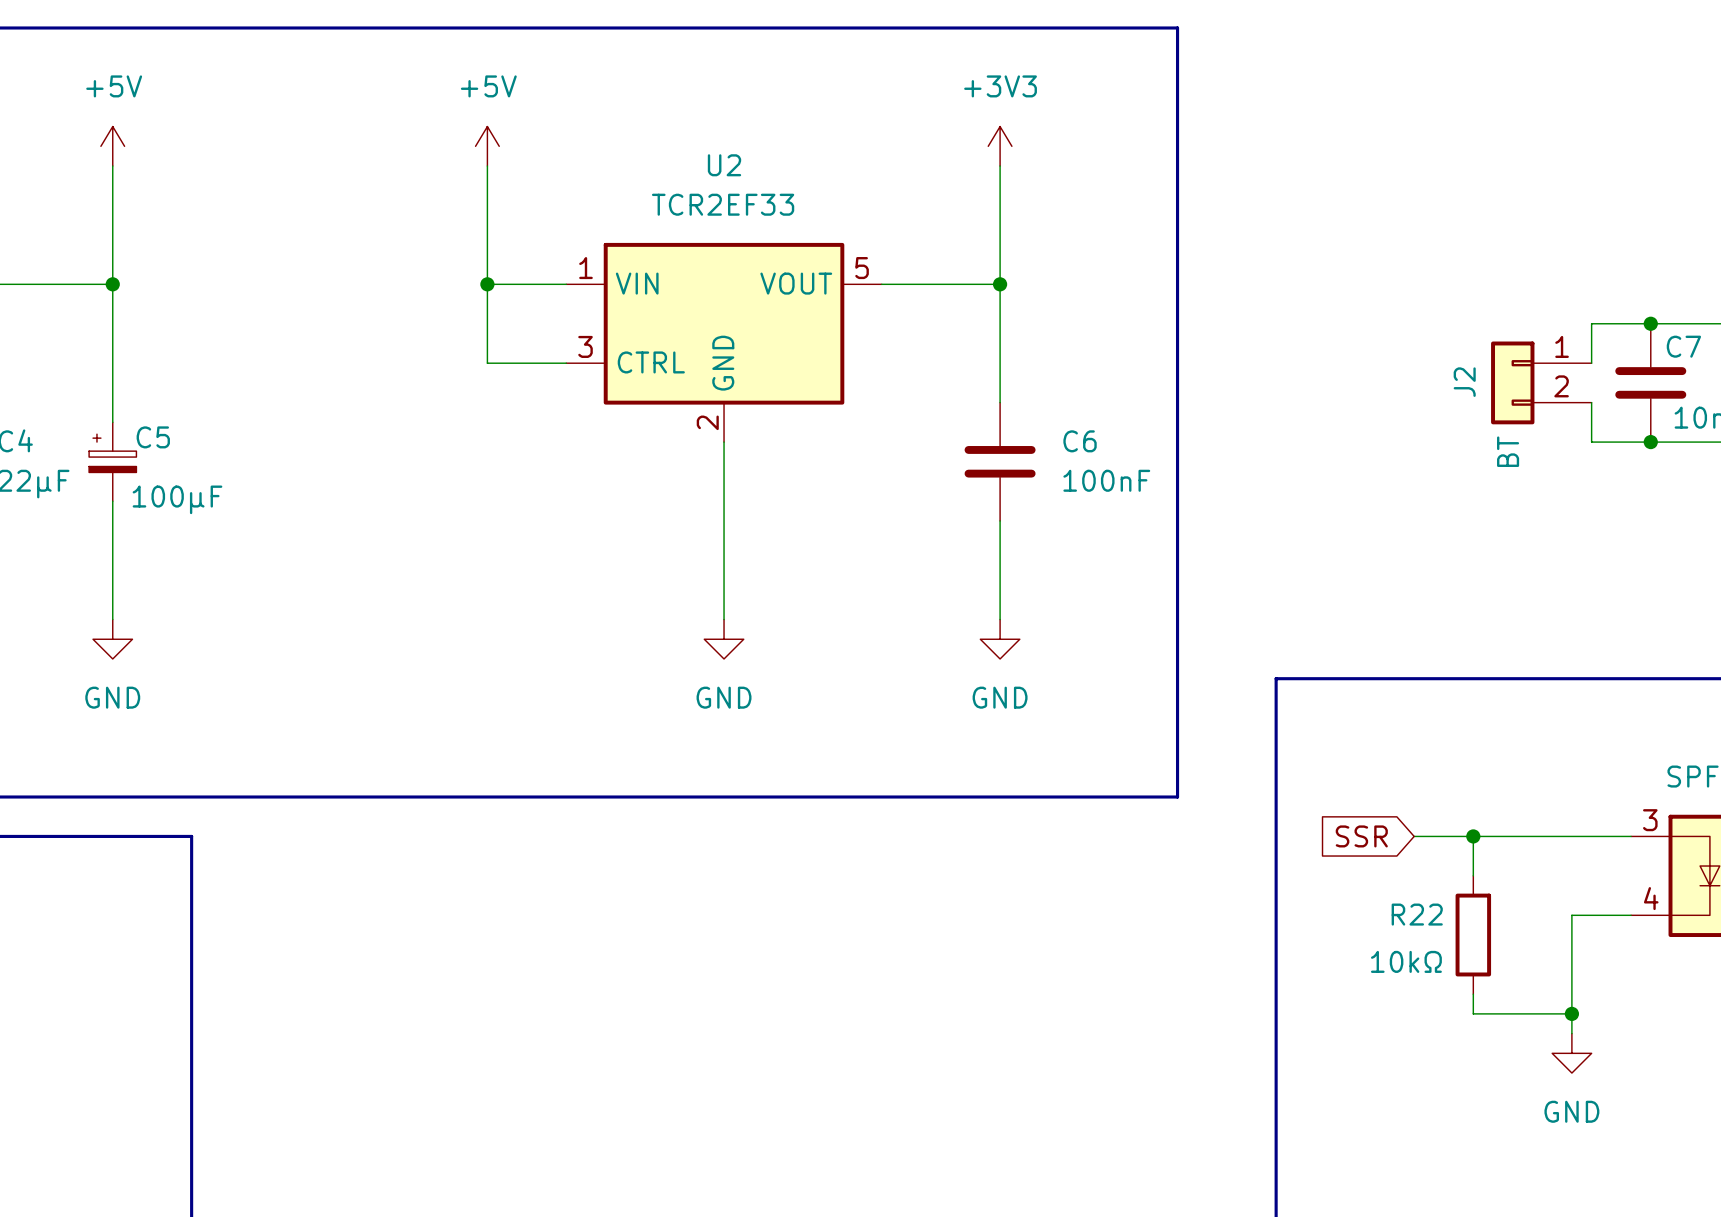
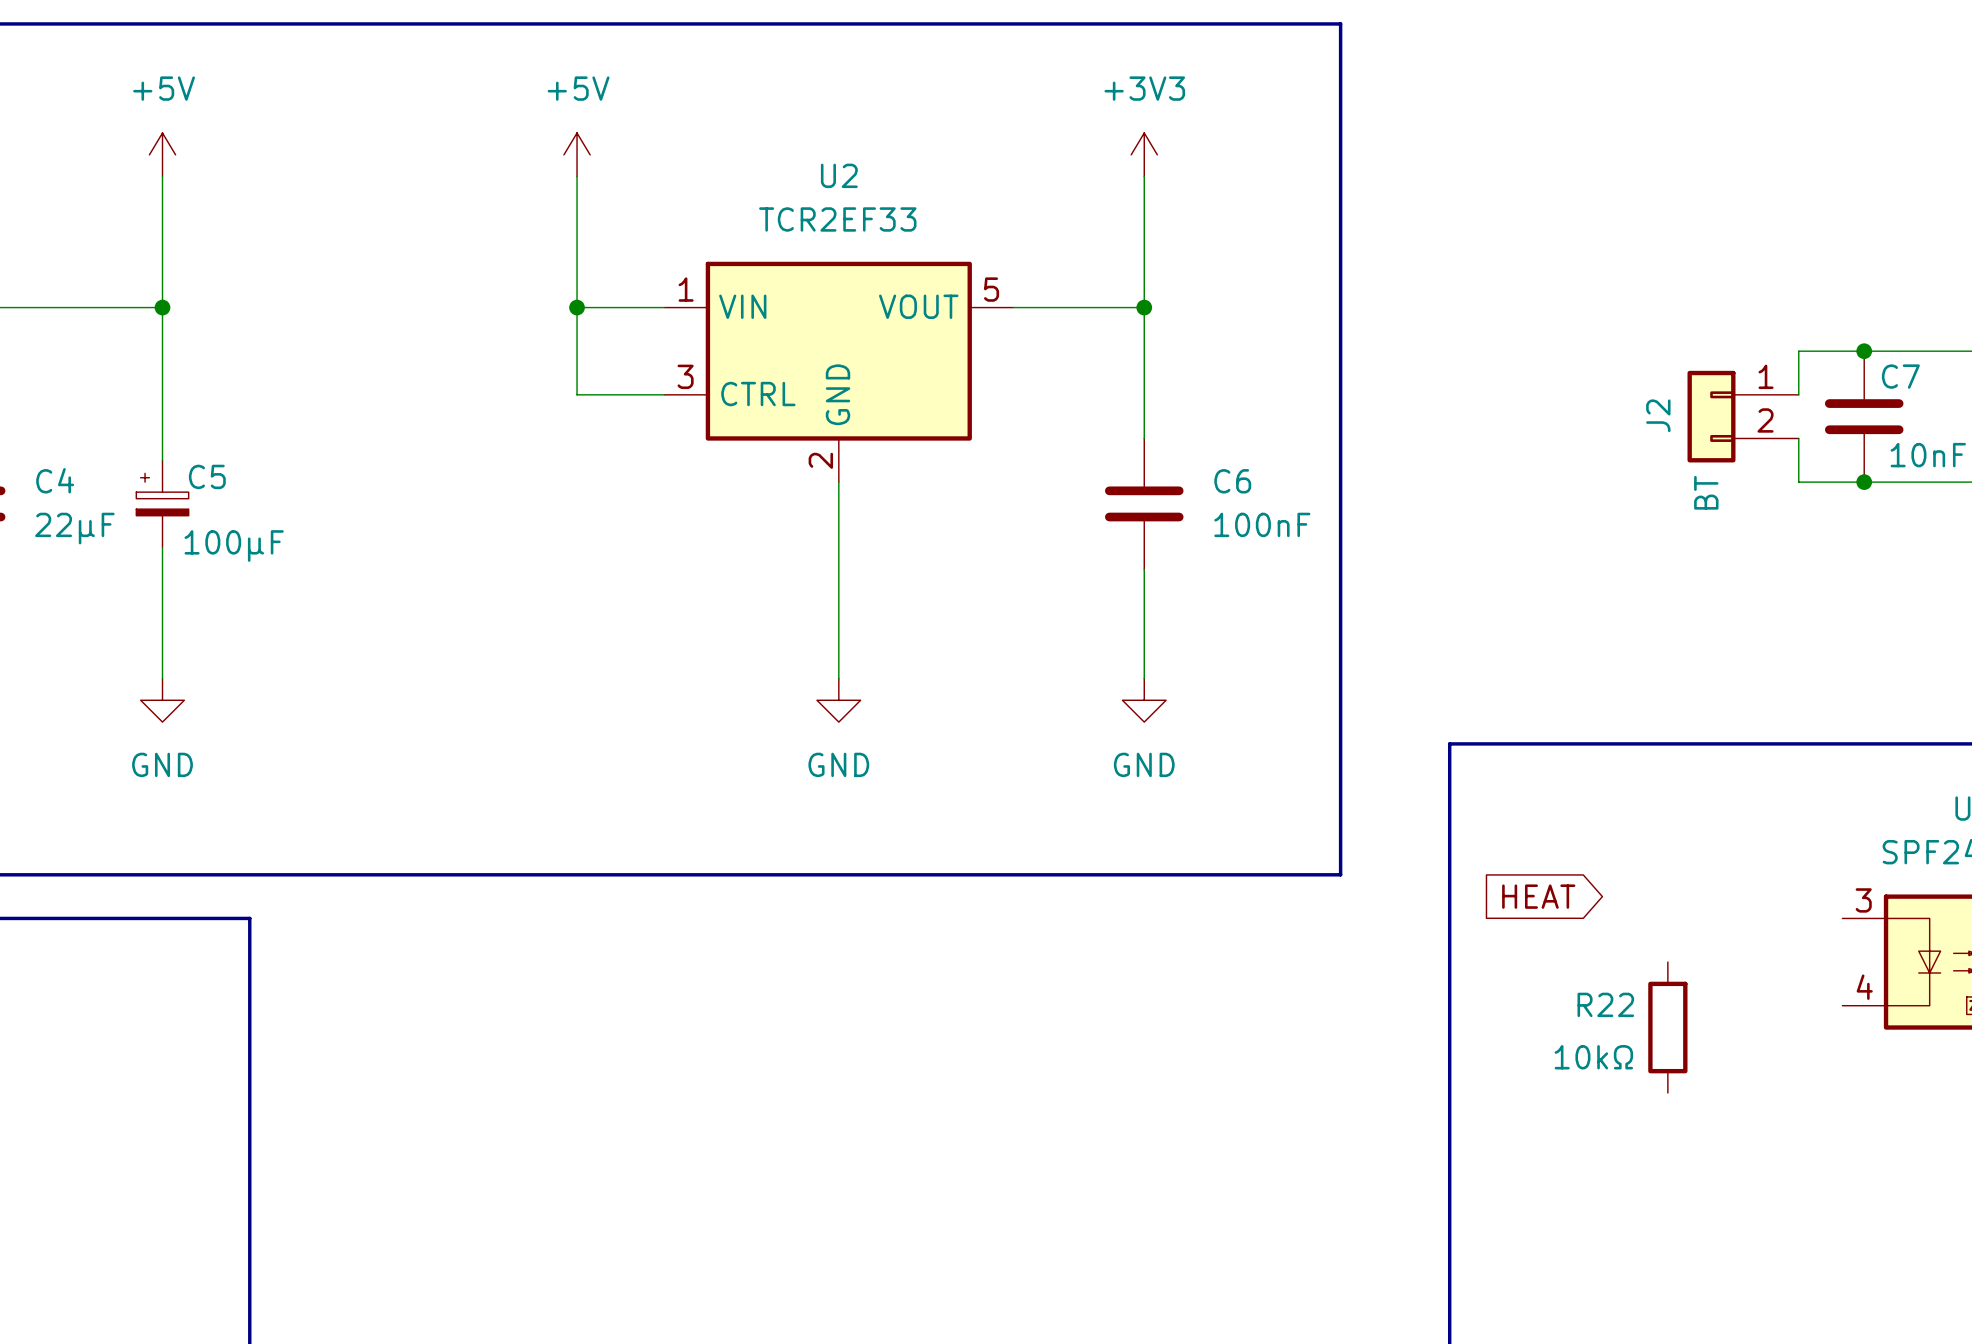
global label: none -> HEAT (1538, 896)
global label: SSR (1361, 836) -> none
wire: (1414, 836) (1631, 836) -> none
wire: (1473, 836) (1473, 875) -> none
junction: (1473, 836) -> none
wire: (1631, 915) (1571, 915) (1571, 1033) -> none
wire: (1473, 994) (1473, 1013) (1571, 1013) -> none
junction: (1571, 1013) -> none
power symbol: GND (1571, 1053) -> none

